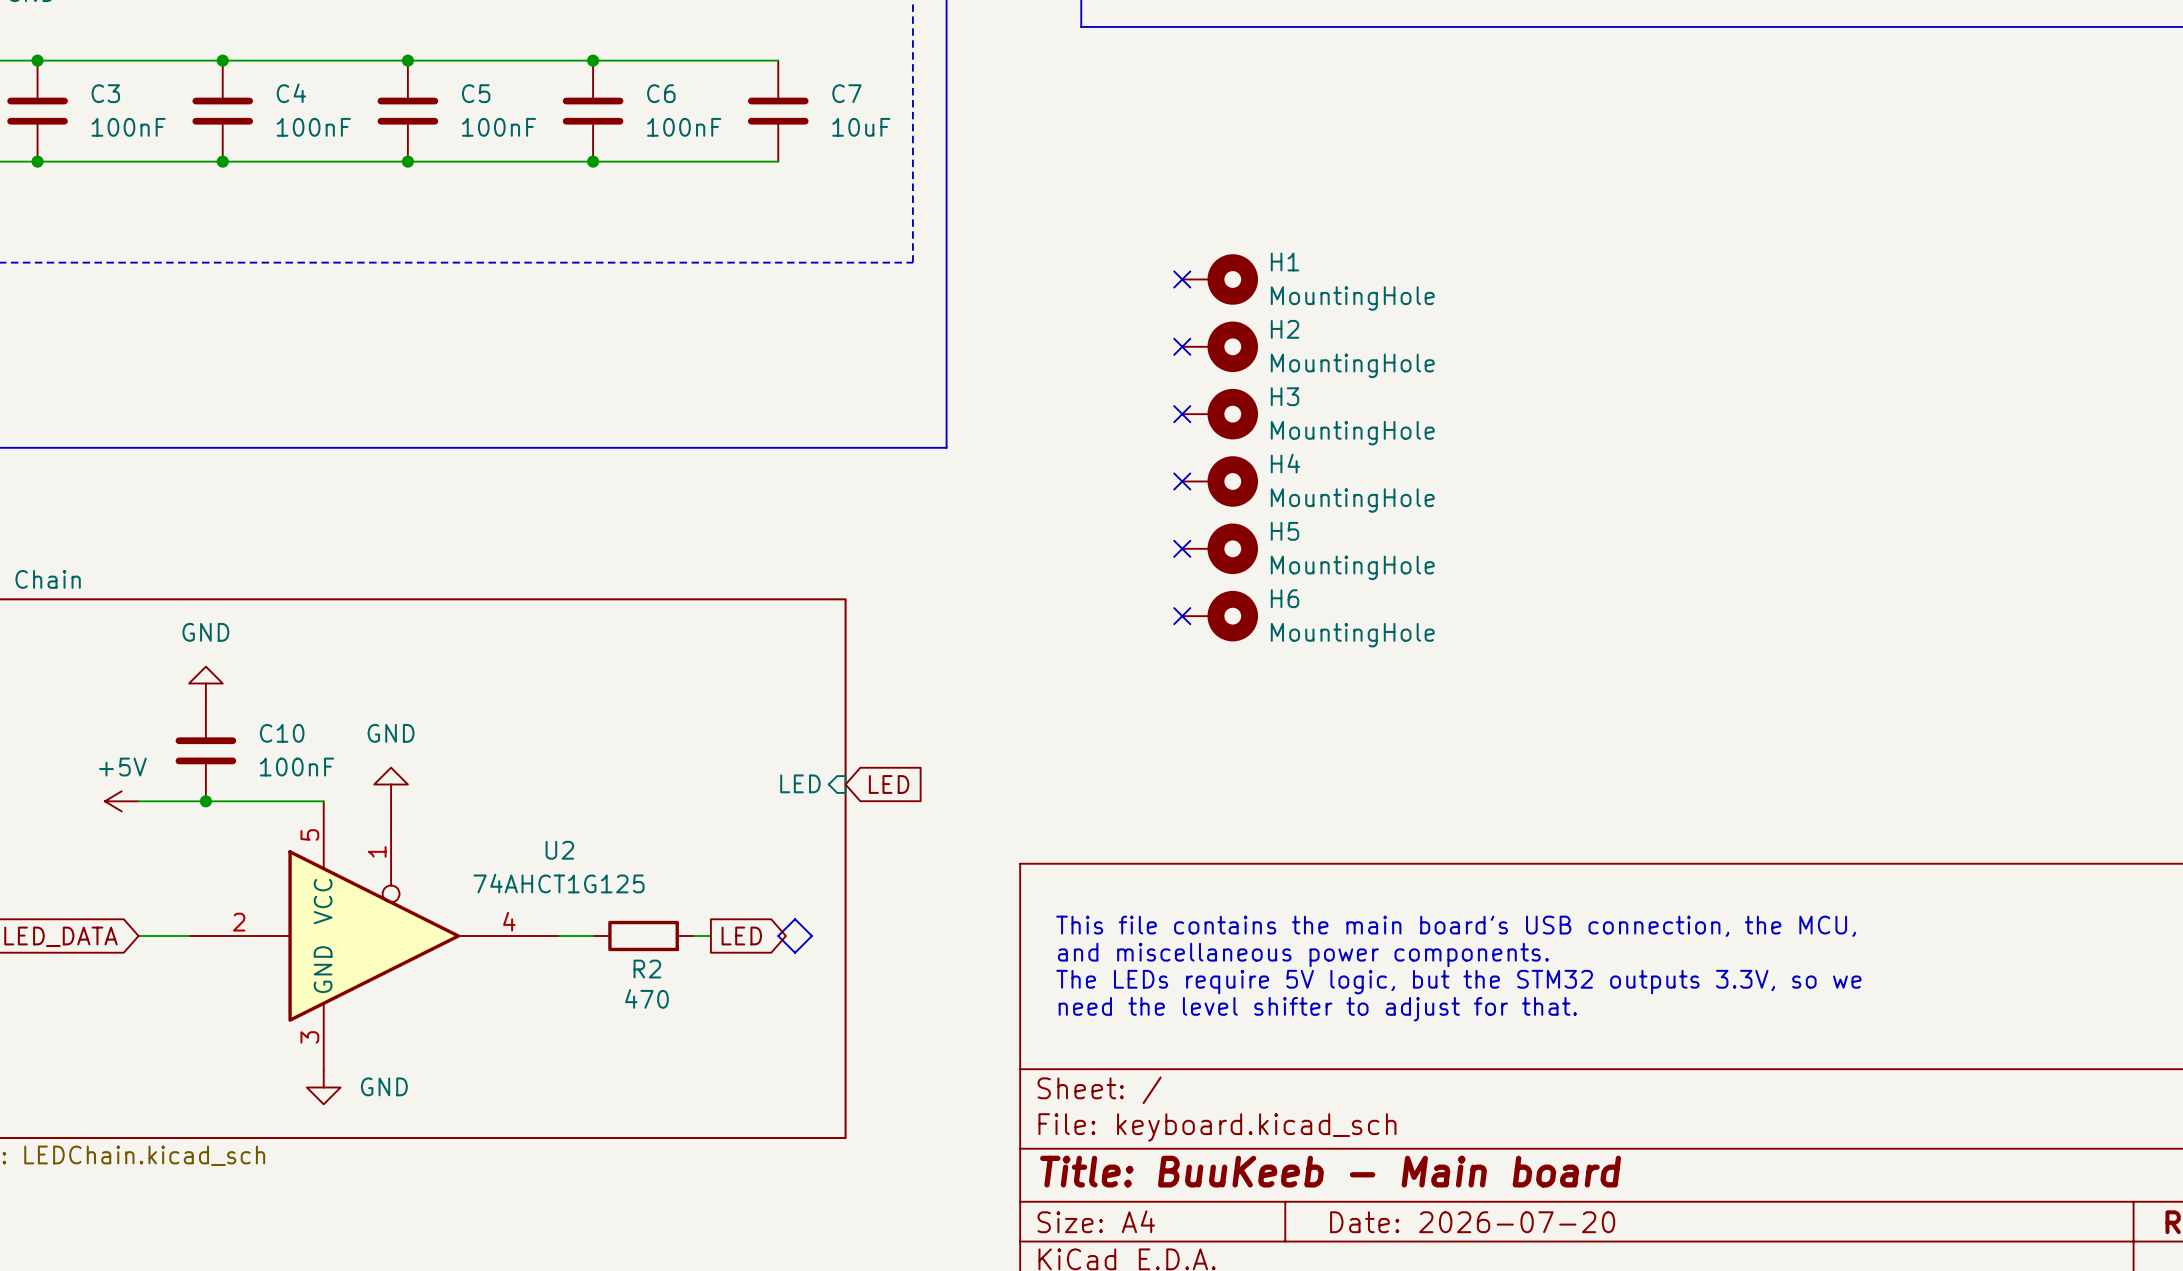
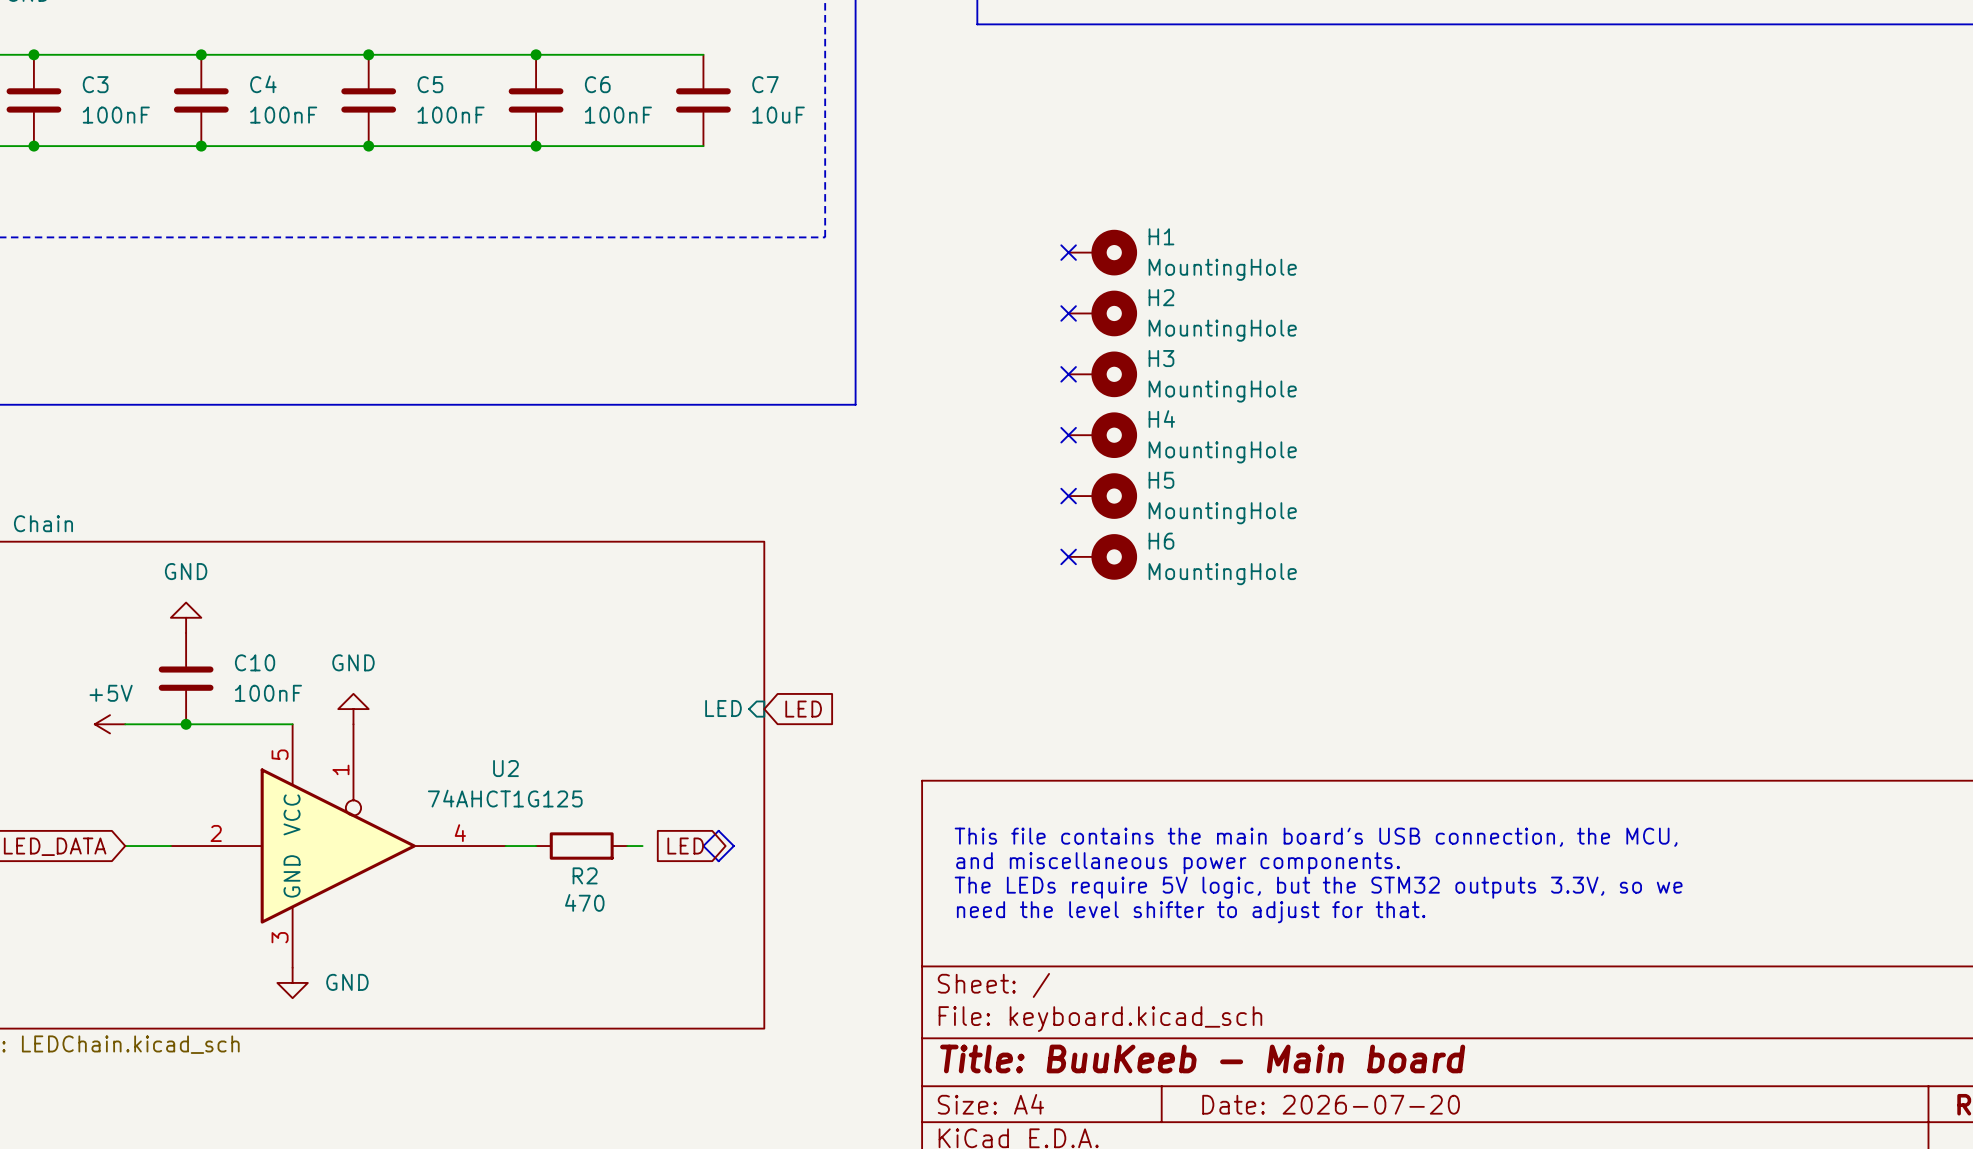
global label position: LED (741, 936) -> LED (685, 846)

